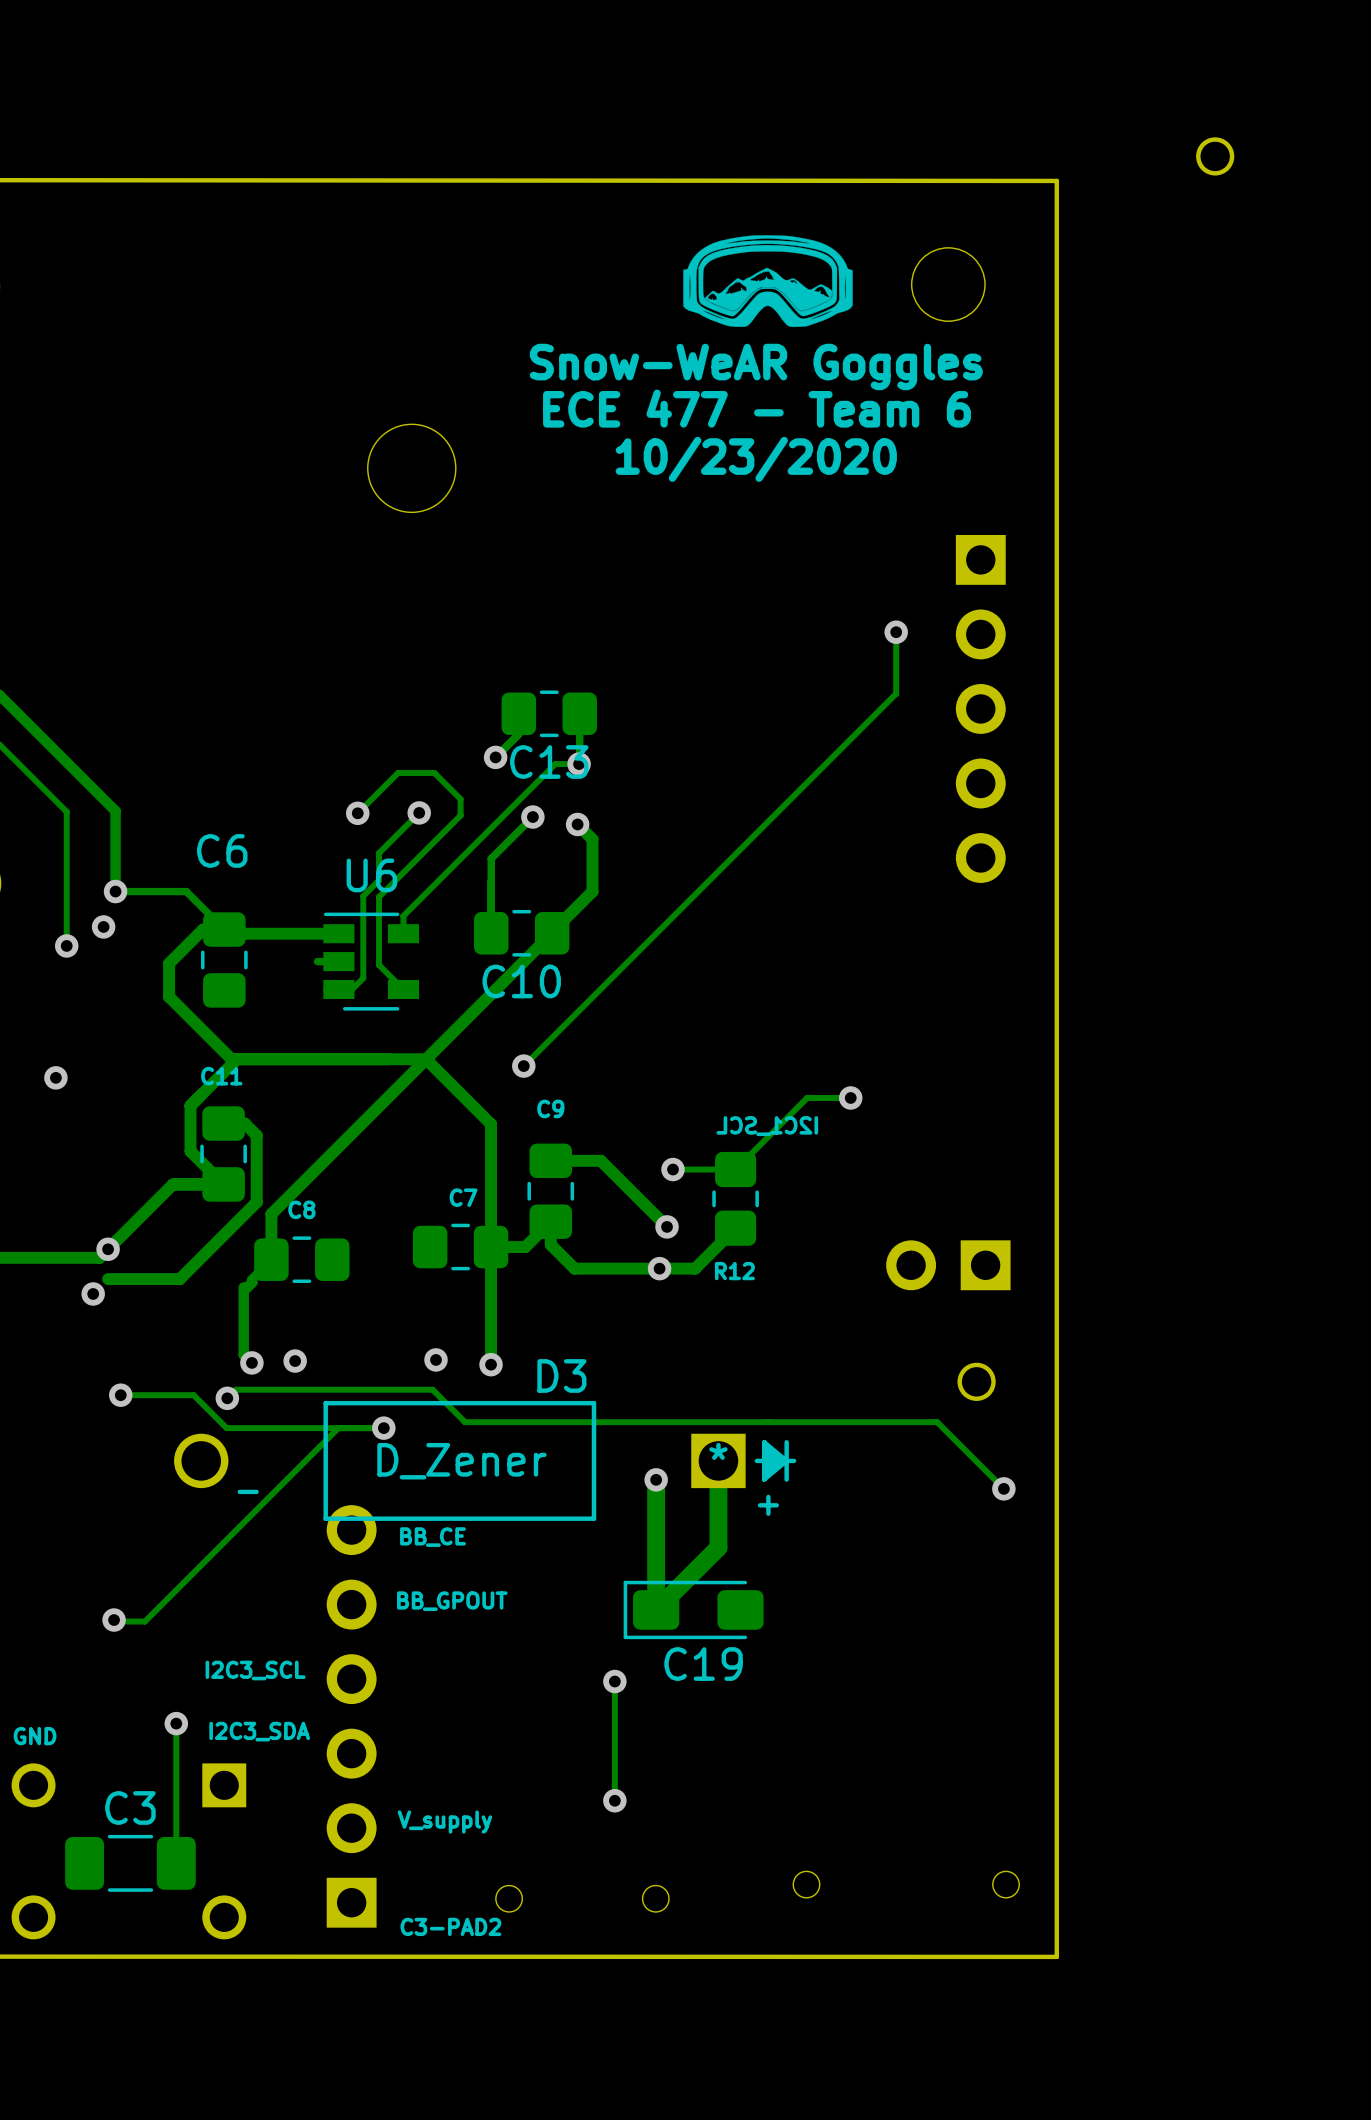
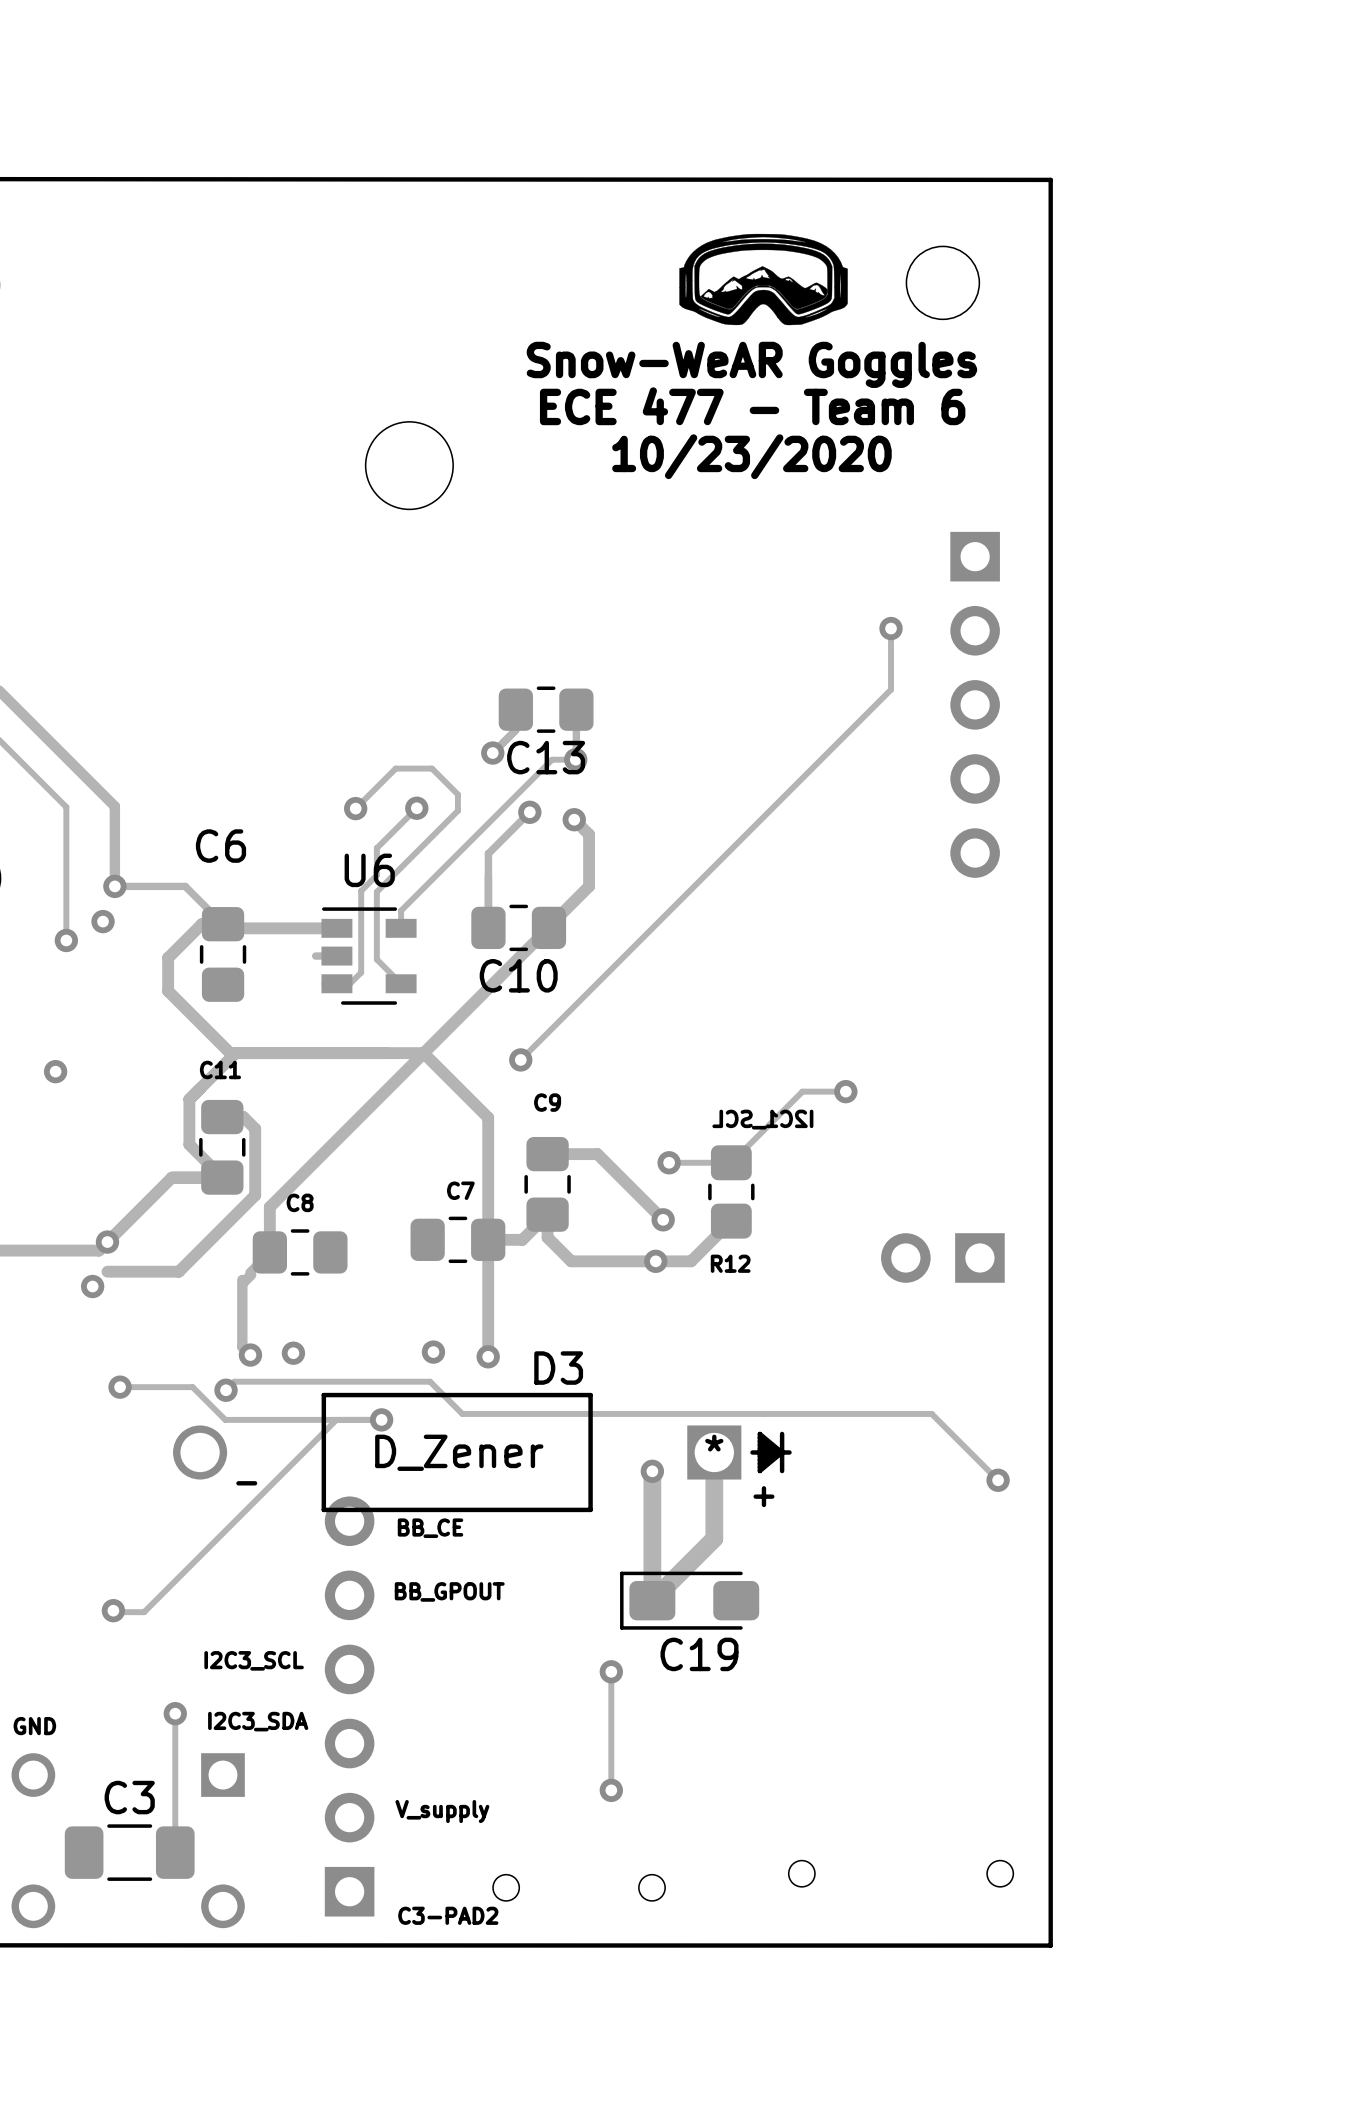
round board edge: [1196, 137, 1235, 176] -> none
round board edge: [957, 1362, 996, 1401] -> none

